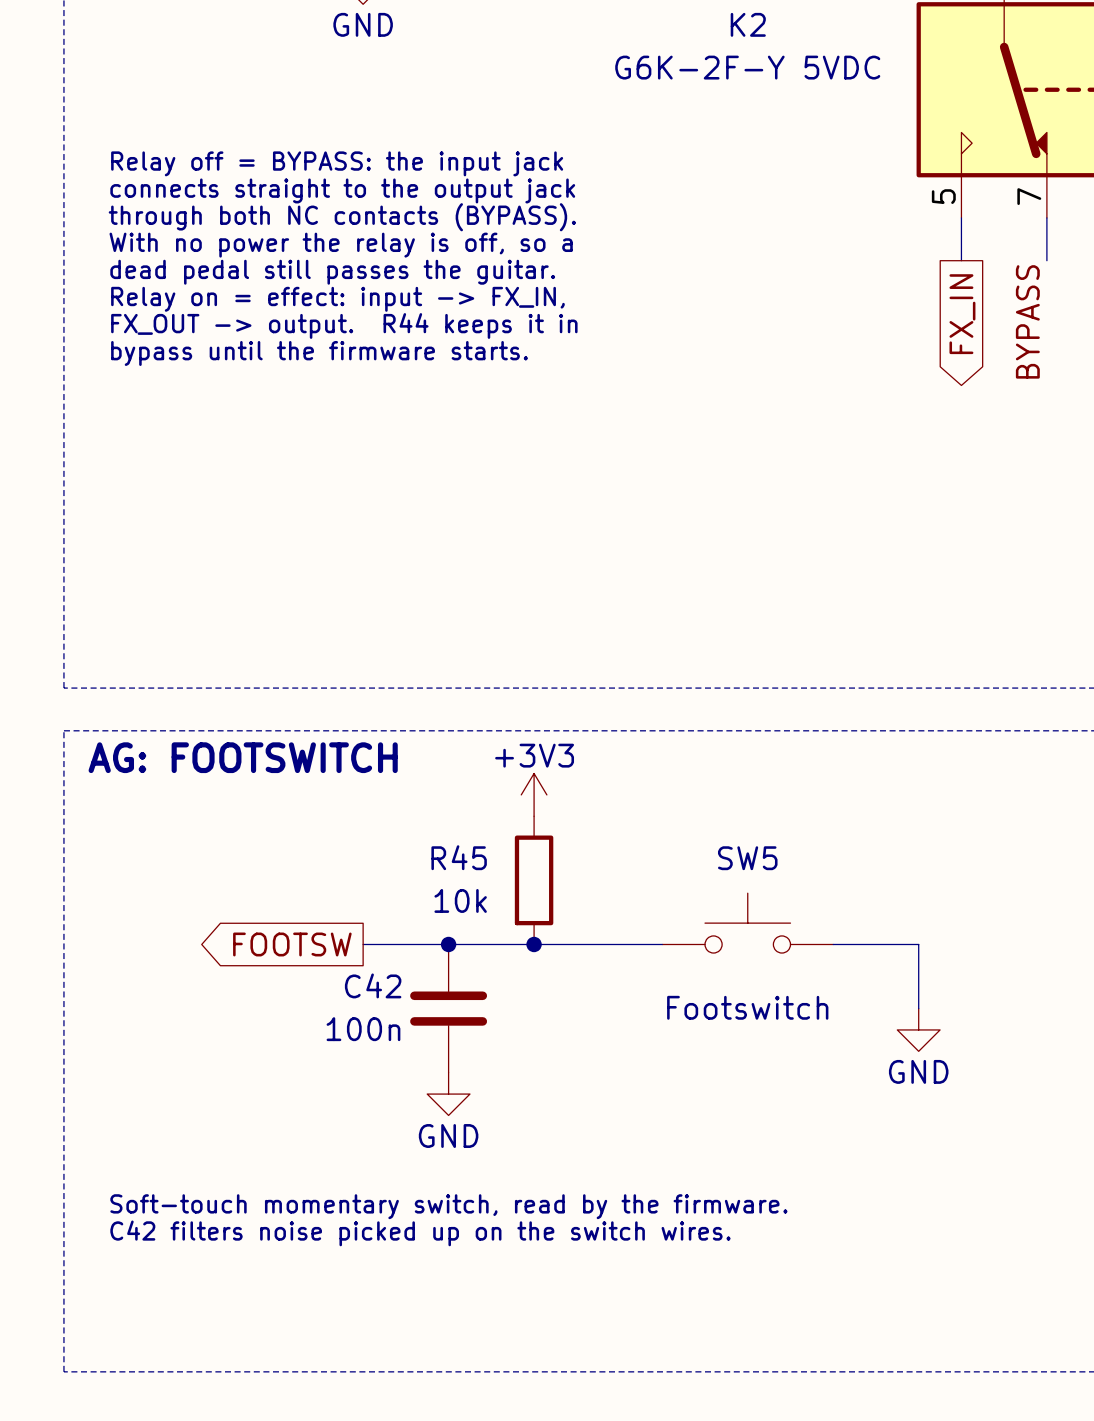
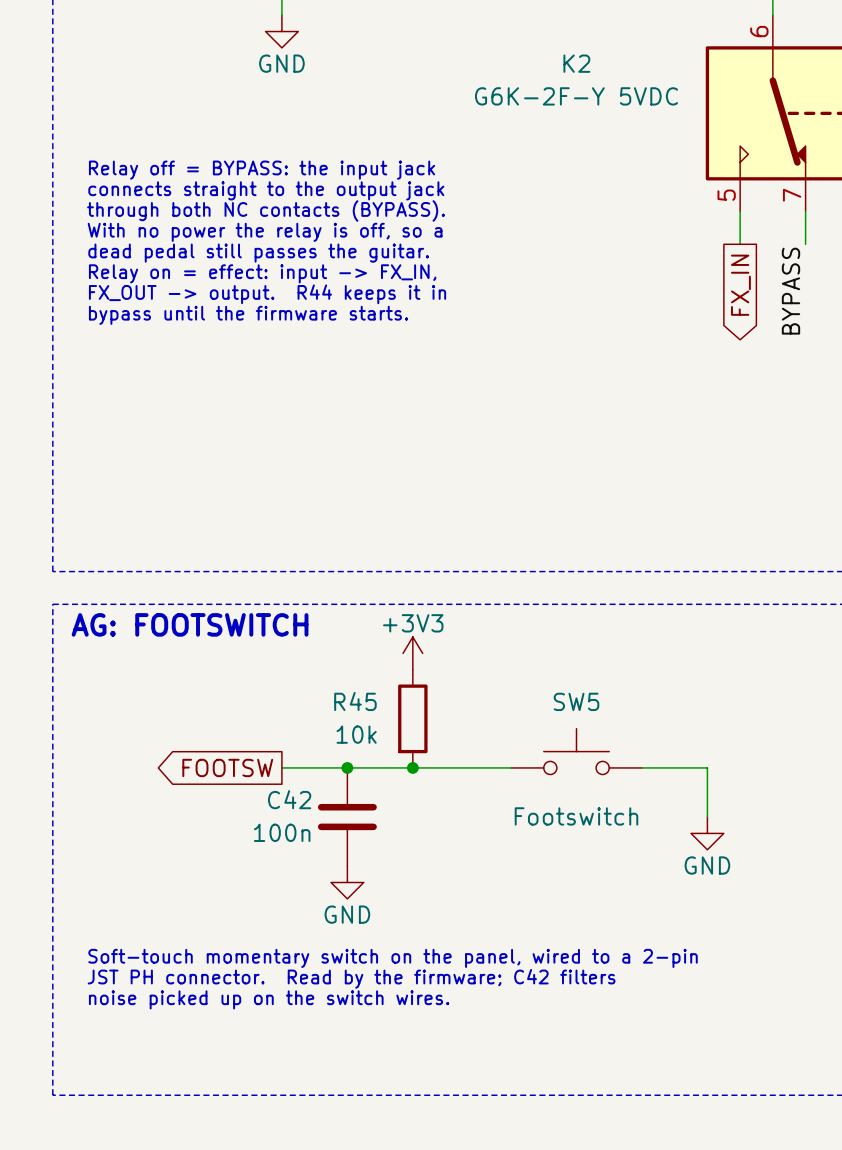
text: Soft-touch momentary switch, read by the firmware. (448, 1206) -> Soft-touch momentary switch on the panel, wired to a 2-pin (393, 958)
text: none -> JST PH connector. Read by the firmware; C42 filters (351, 978)
text: C42 filters noise picked up on the switch wires. (420, 1233) -> noise picked up on the switch wires. (269, 999)

